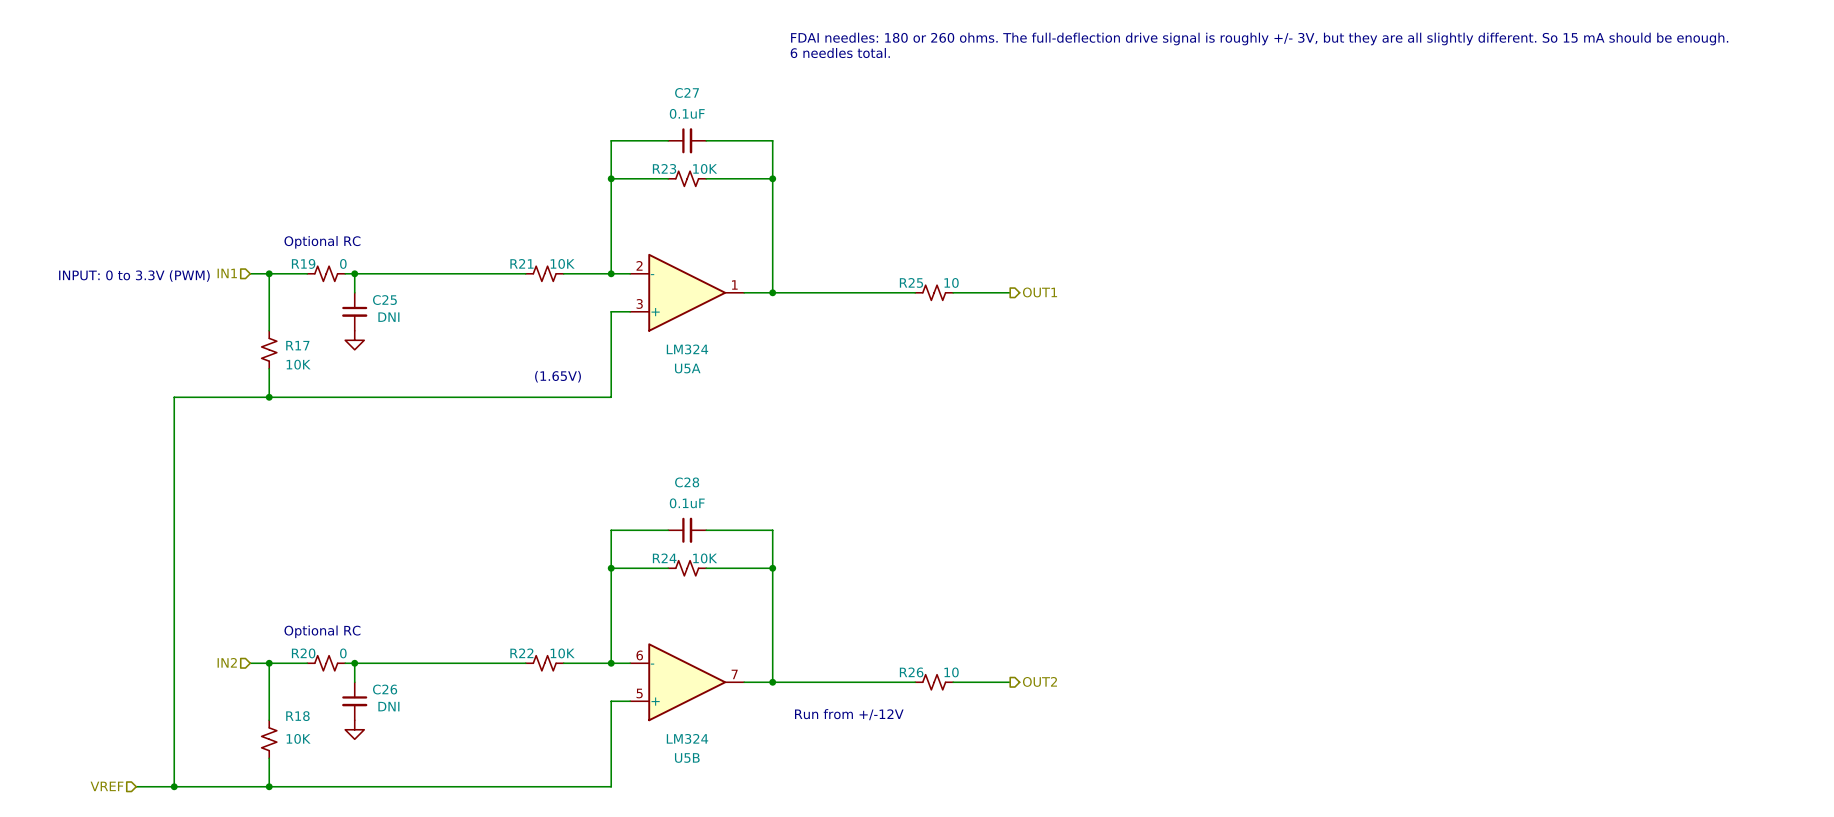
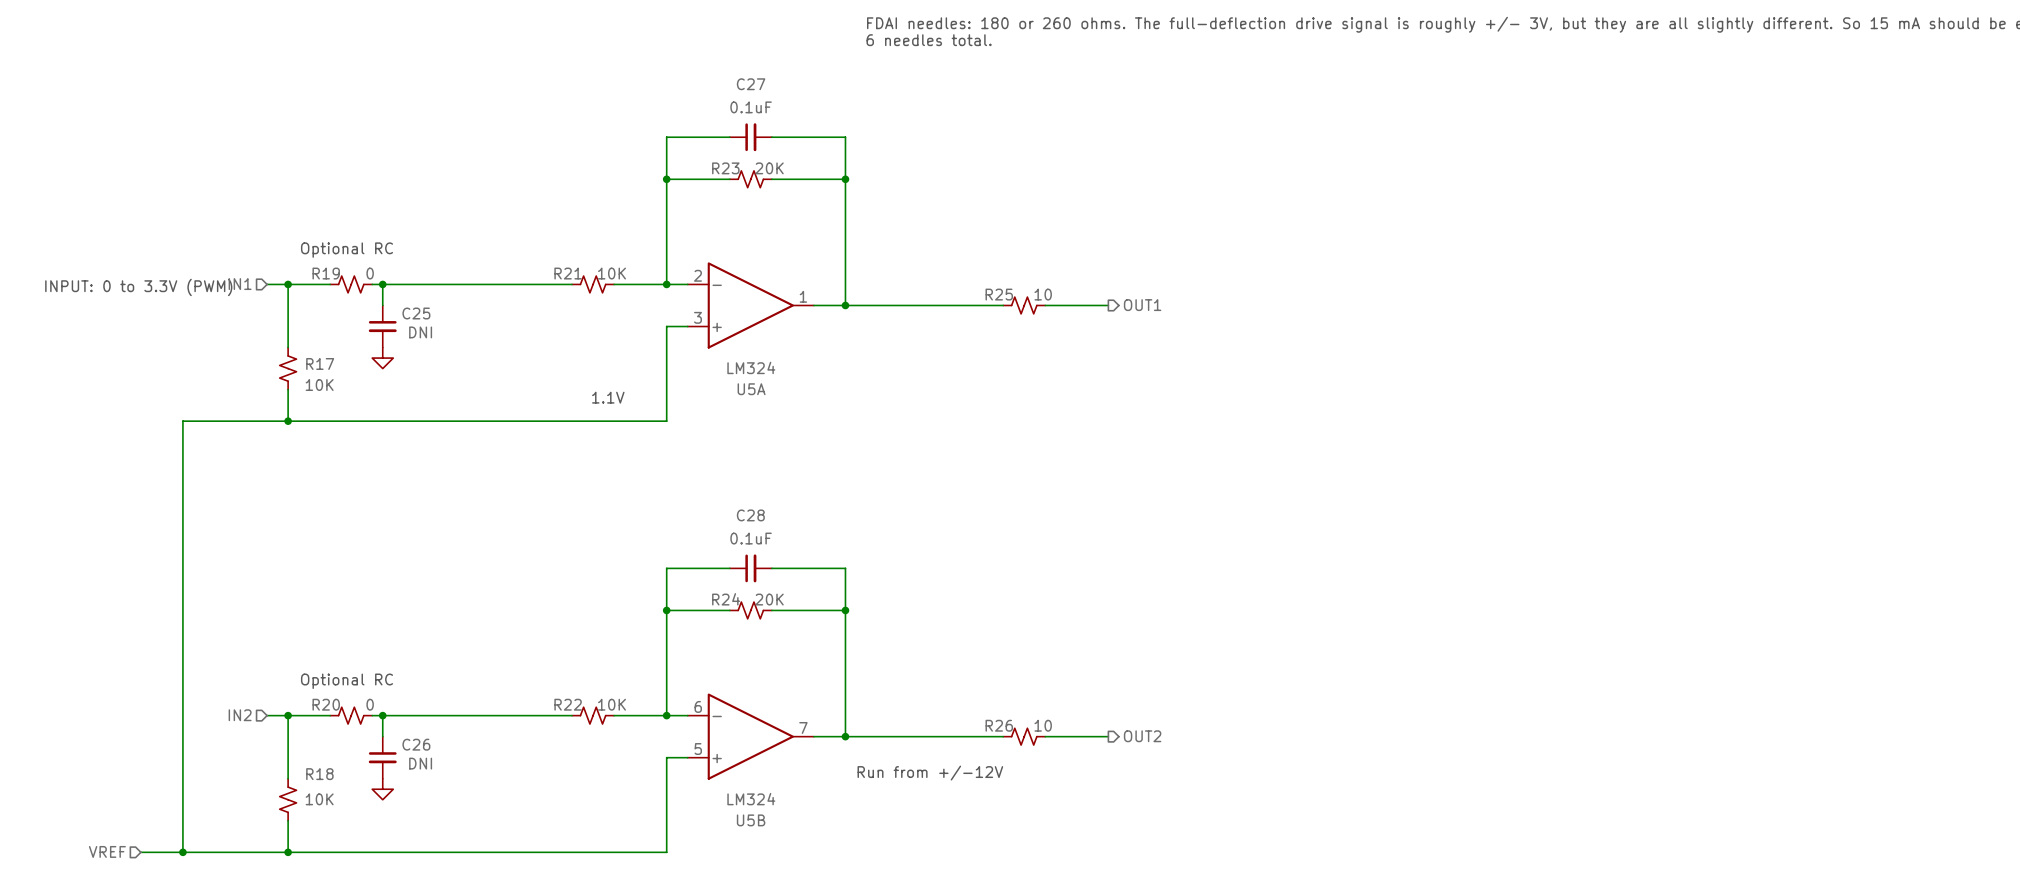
R23 value: 10K (705, 168) -> 20K (769, 168)
text: (1.65V) (558, 376) -> 1.1V (608, 397)
R24 value: 10K (705, 558) -> 20K (769, 599)

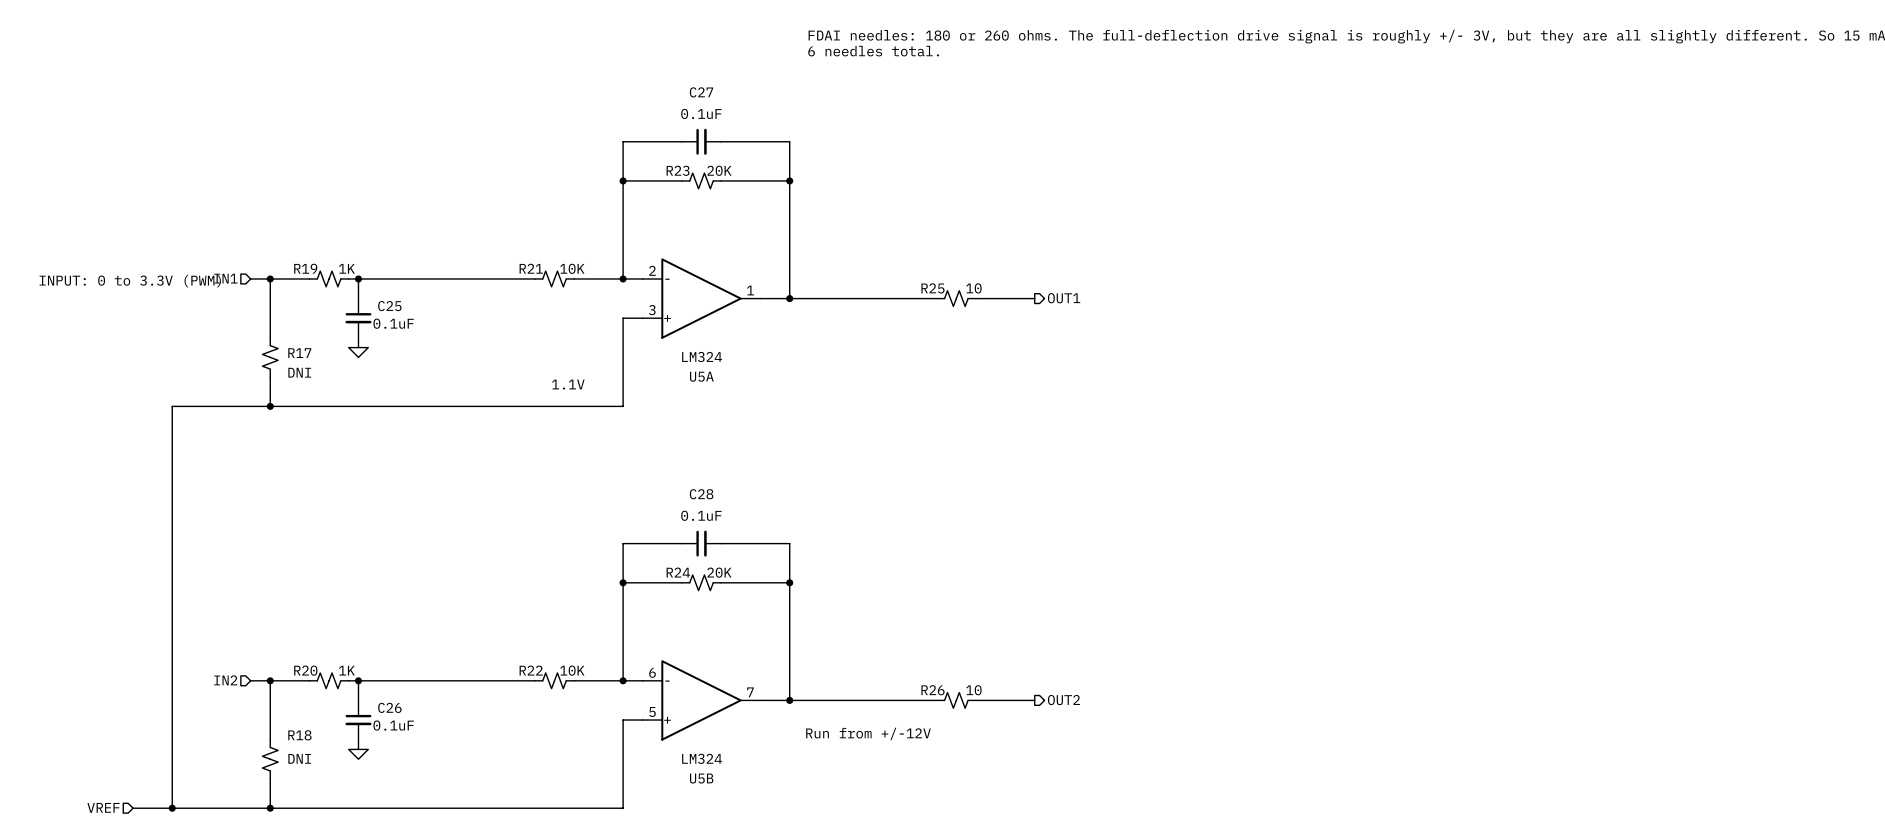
text: Optional RC (346, 250) -> none
R19 value: 0 (370, 273) -> 1K (346, 268)
C25 value: DNI (420, 332) -> 0.1uF (393, 323)
R17 value: 10K (319, 385) -> DNI (299, 372)
text: Optional RC (346, 681) -> none
R20 value: 0 (370, 704) -> 1K (346, 670)
C26 value: DNI (420, 763) -> 0.1uF (393, 725)
R18 value: 10K (319, 799) -> DNI (299, 758)

